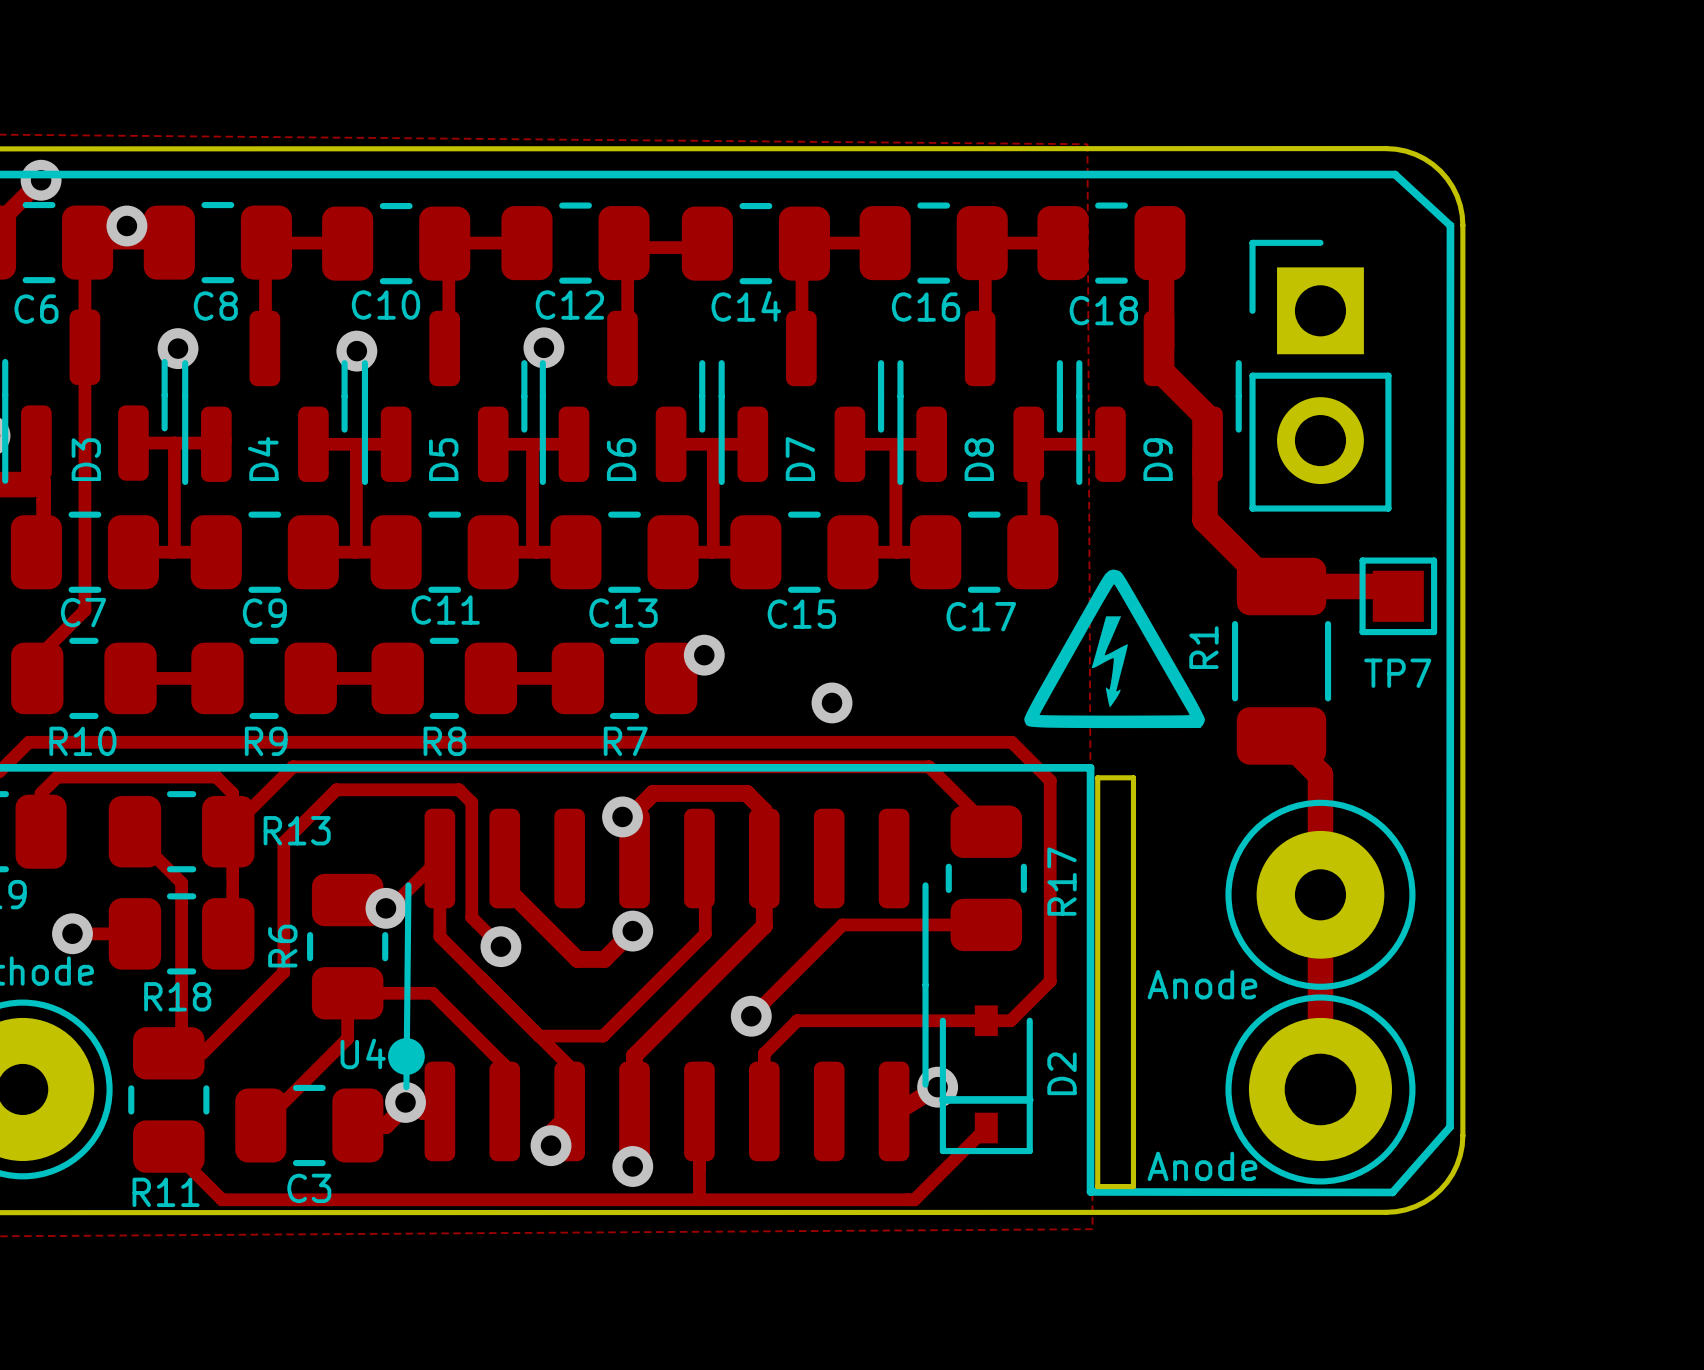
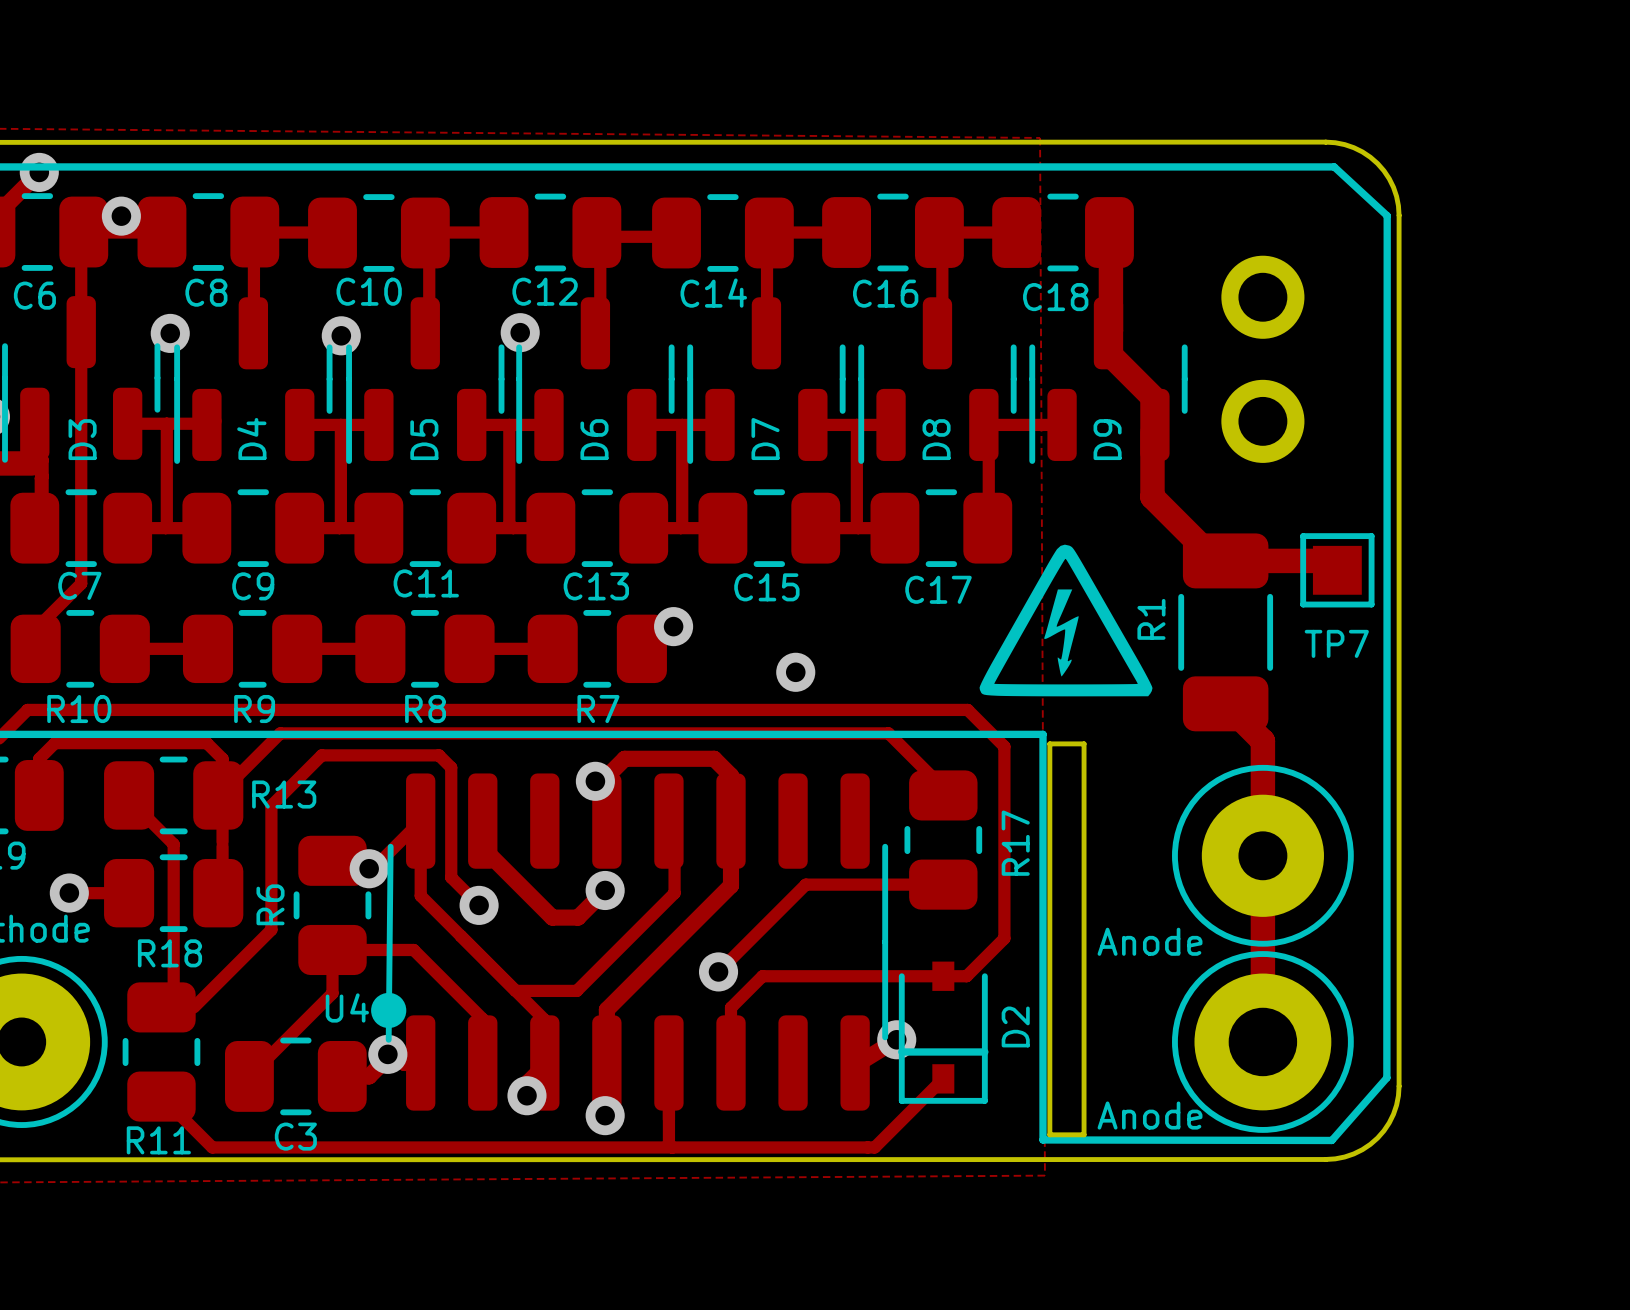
part footprint: [1249, 239, 1392, 512] -> [1221, 255, 1305, 463]

